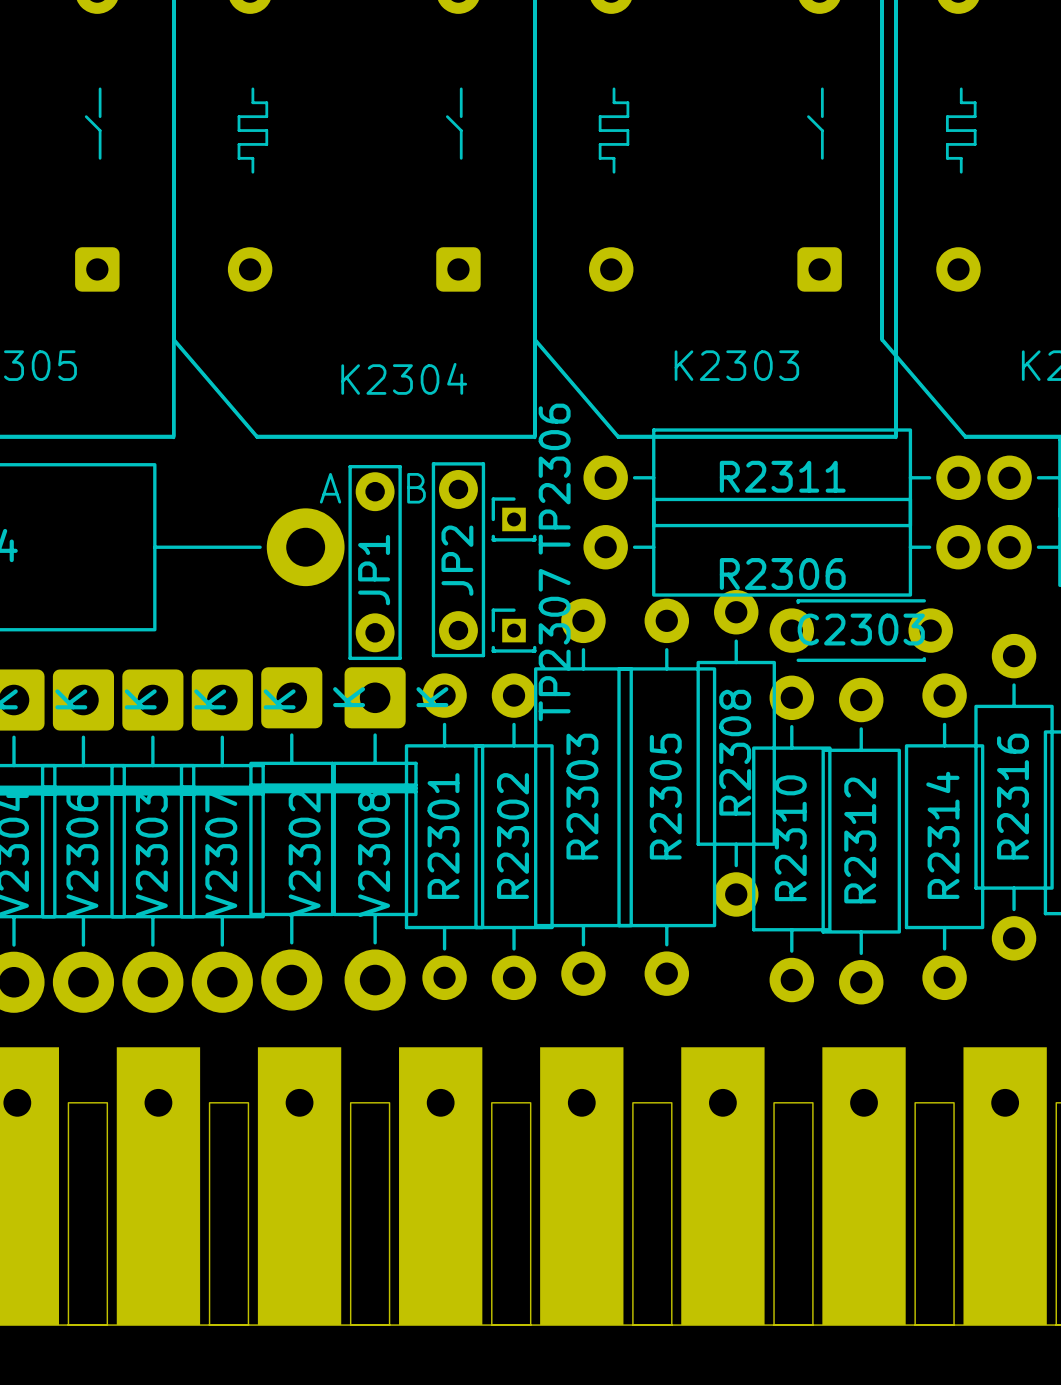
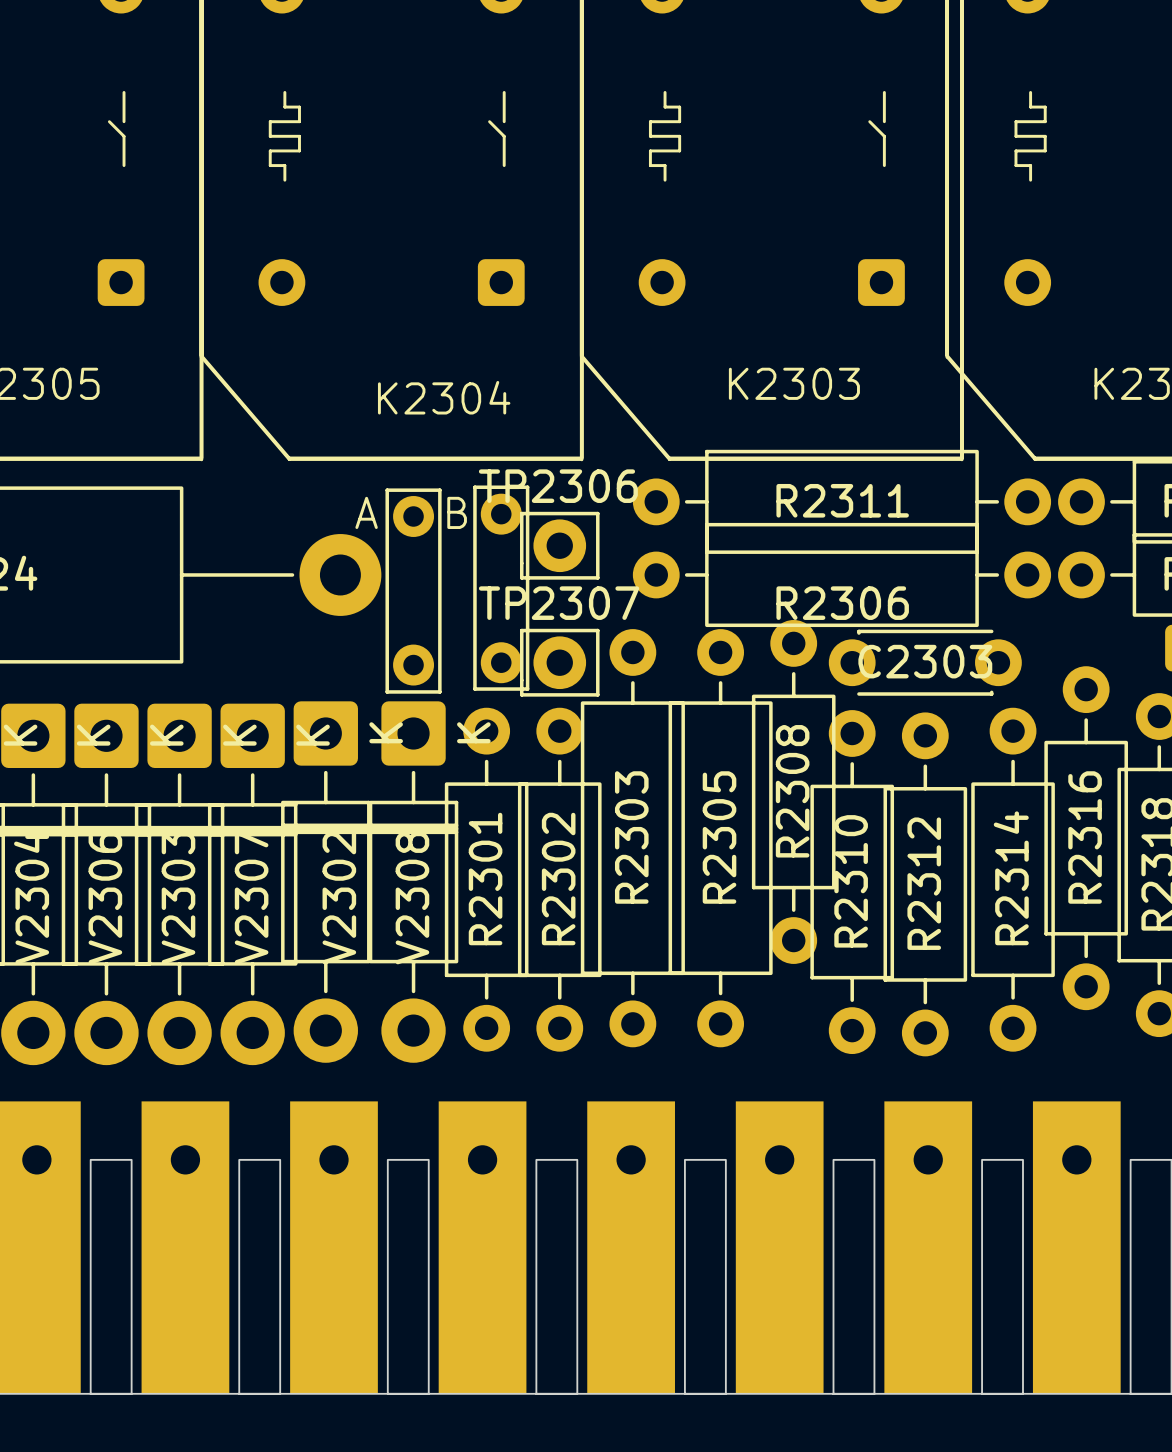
TP2306 footprint: [491, 497, 537, 542] -> [519, 511, 600, 580]
JP2 name: JP2 (457, 560) -> none
JP1 name: JP1 (374, 570) -> none
TP2307 footprint: [491, 608, 537, 653] -> [519, 628, 600, 697]
TP2307 name position: TP2307 (554, 645) -> TP2307 (559, 603)

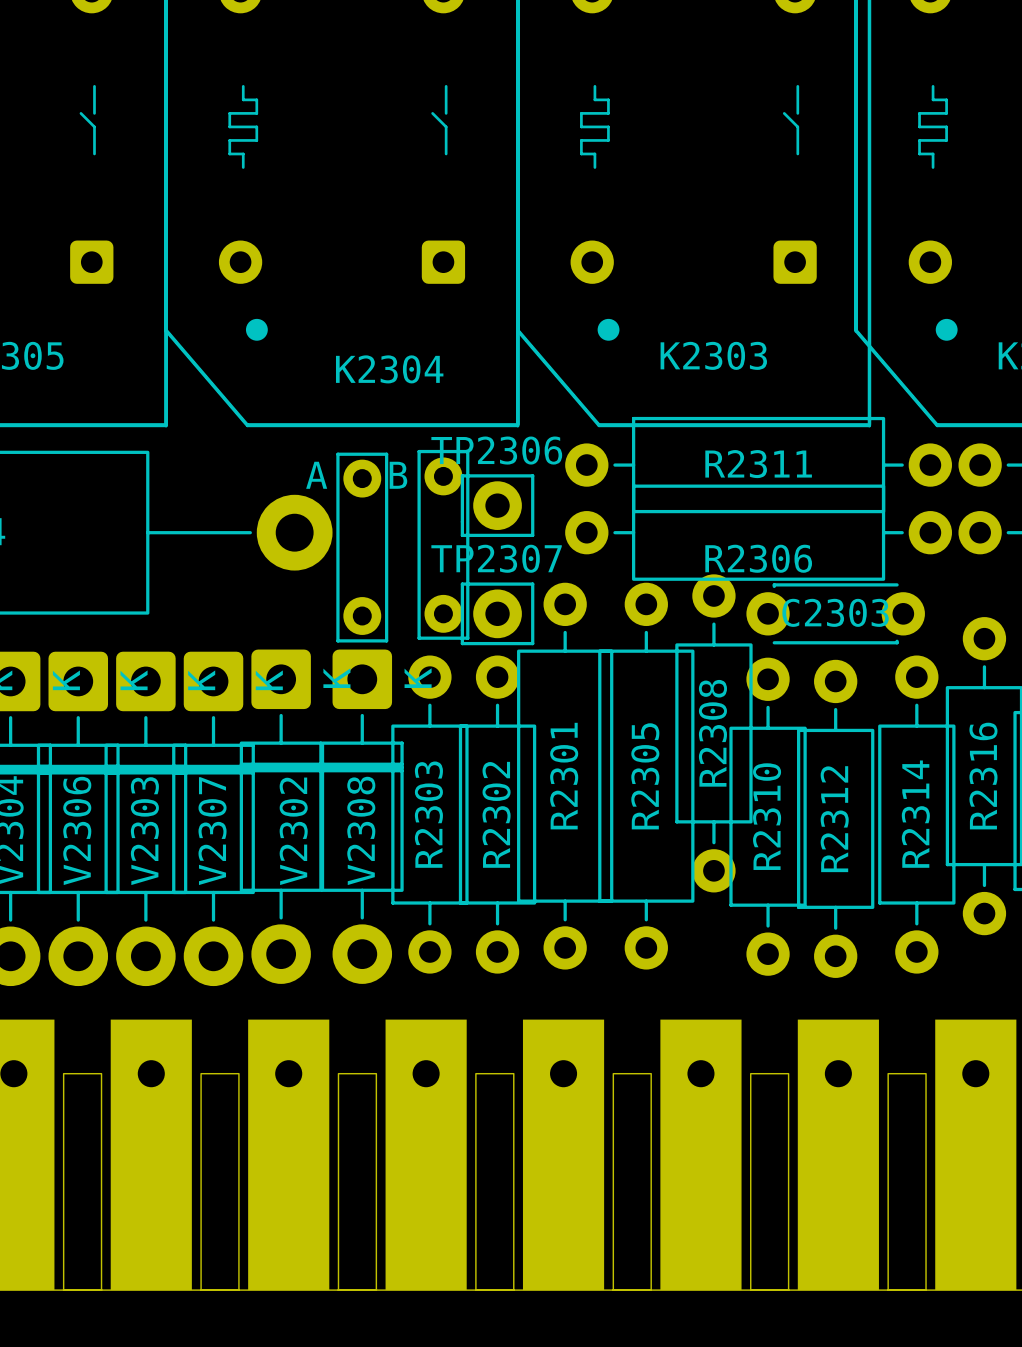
drawing: none -> [245, 318, 268, 341]
drawing: none -> [597, 318, 620, 341]
drawing: none -> [935, 318, 958, 341]
R2303 name: R2303 (631, 837) -> R2301 (564, 776)
R2301 name: R2301 (485, 879) -> R2303 (428, 814)

